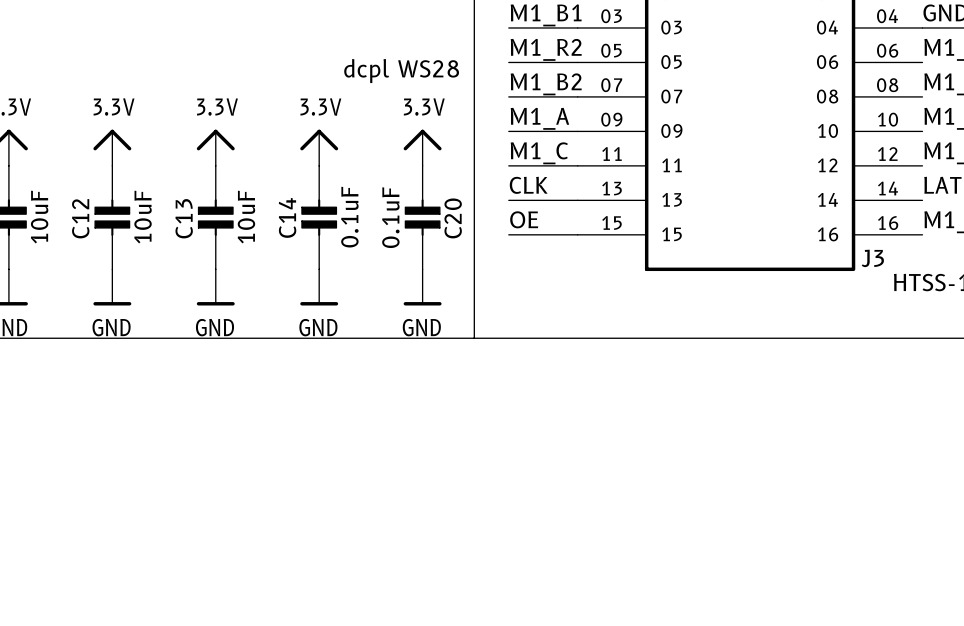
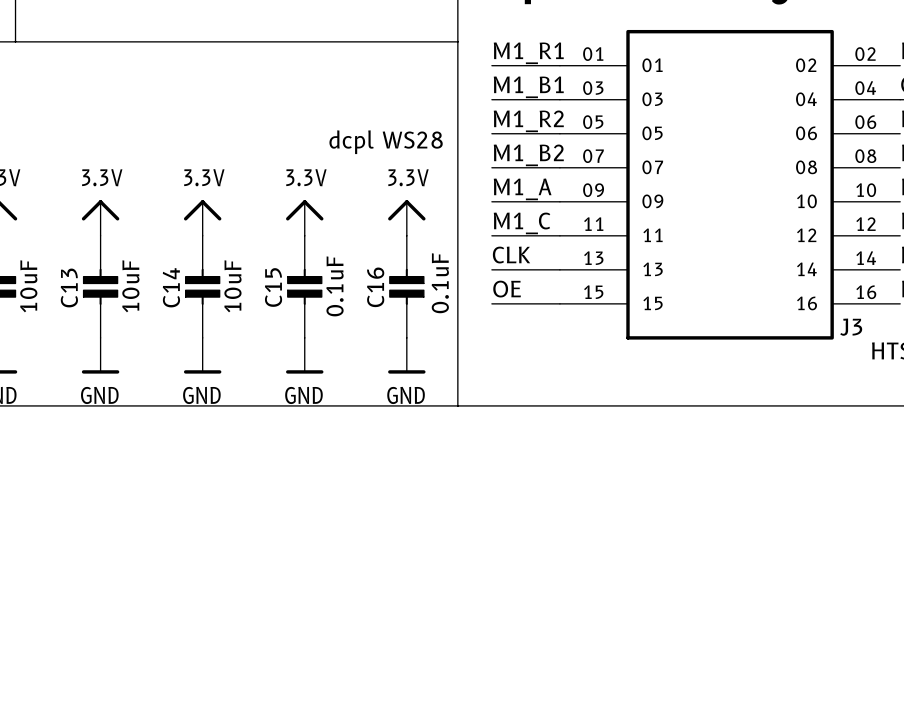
C14 name: C14 (287, 217) -> C15 (273, 287)
C20 value position: 0.1uF (390, 217) -> 0.1uF (440, 283)
C12 name: C12 (80, 218) -> C13 (69, 287)
C13 name: C13 (184, 218) -> C14 (171, 287)
C20 name: C20 (453, 218) -> C16 (375, 287)

